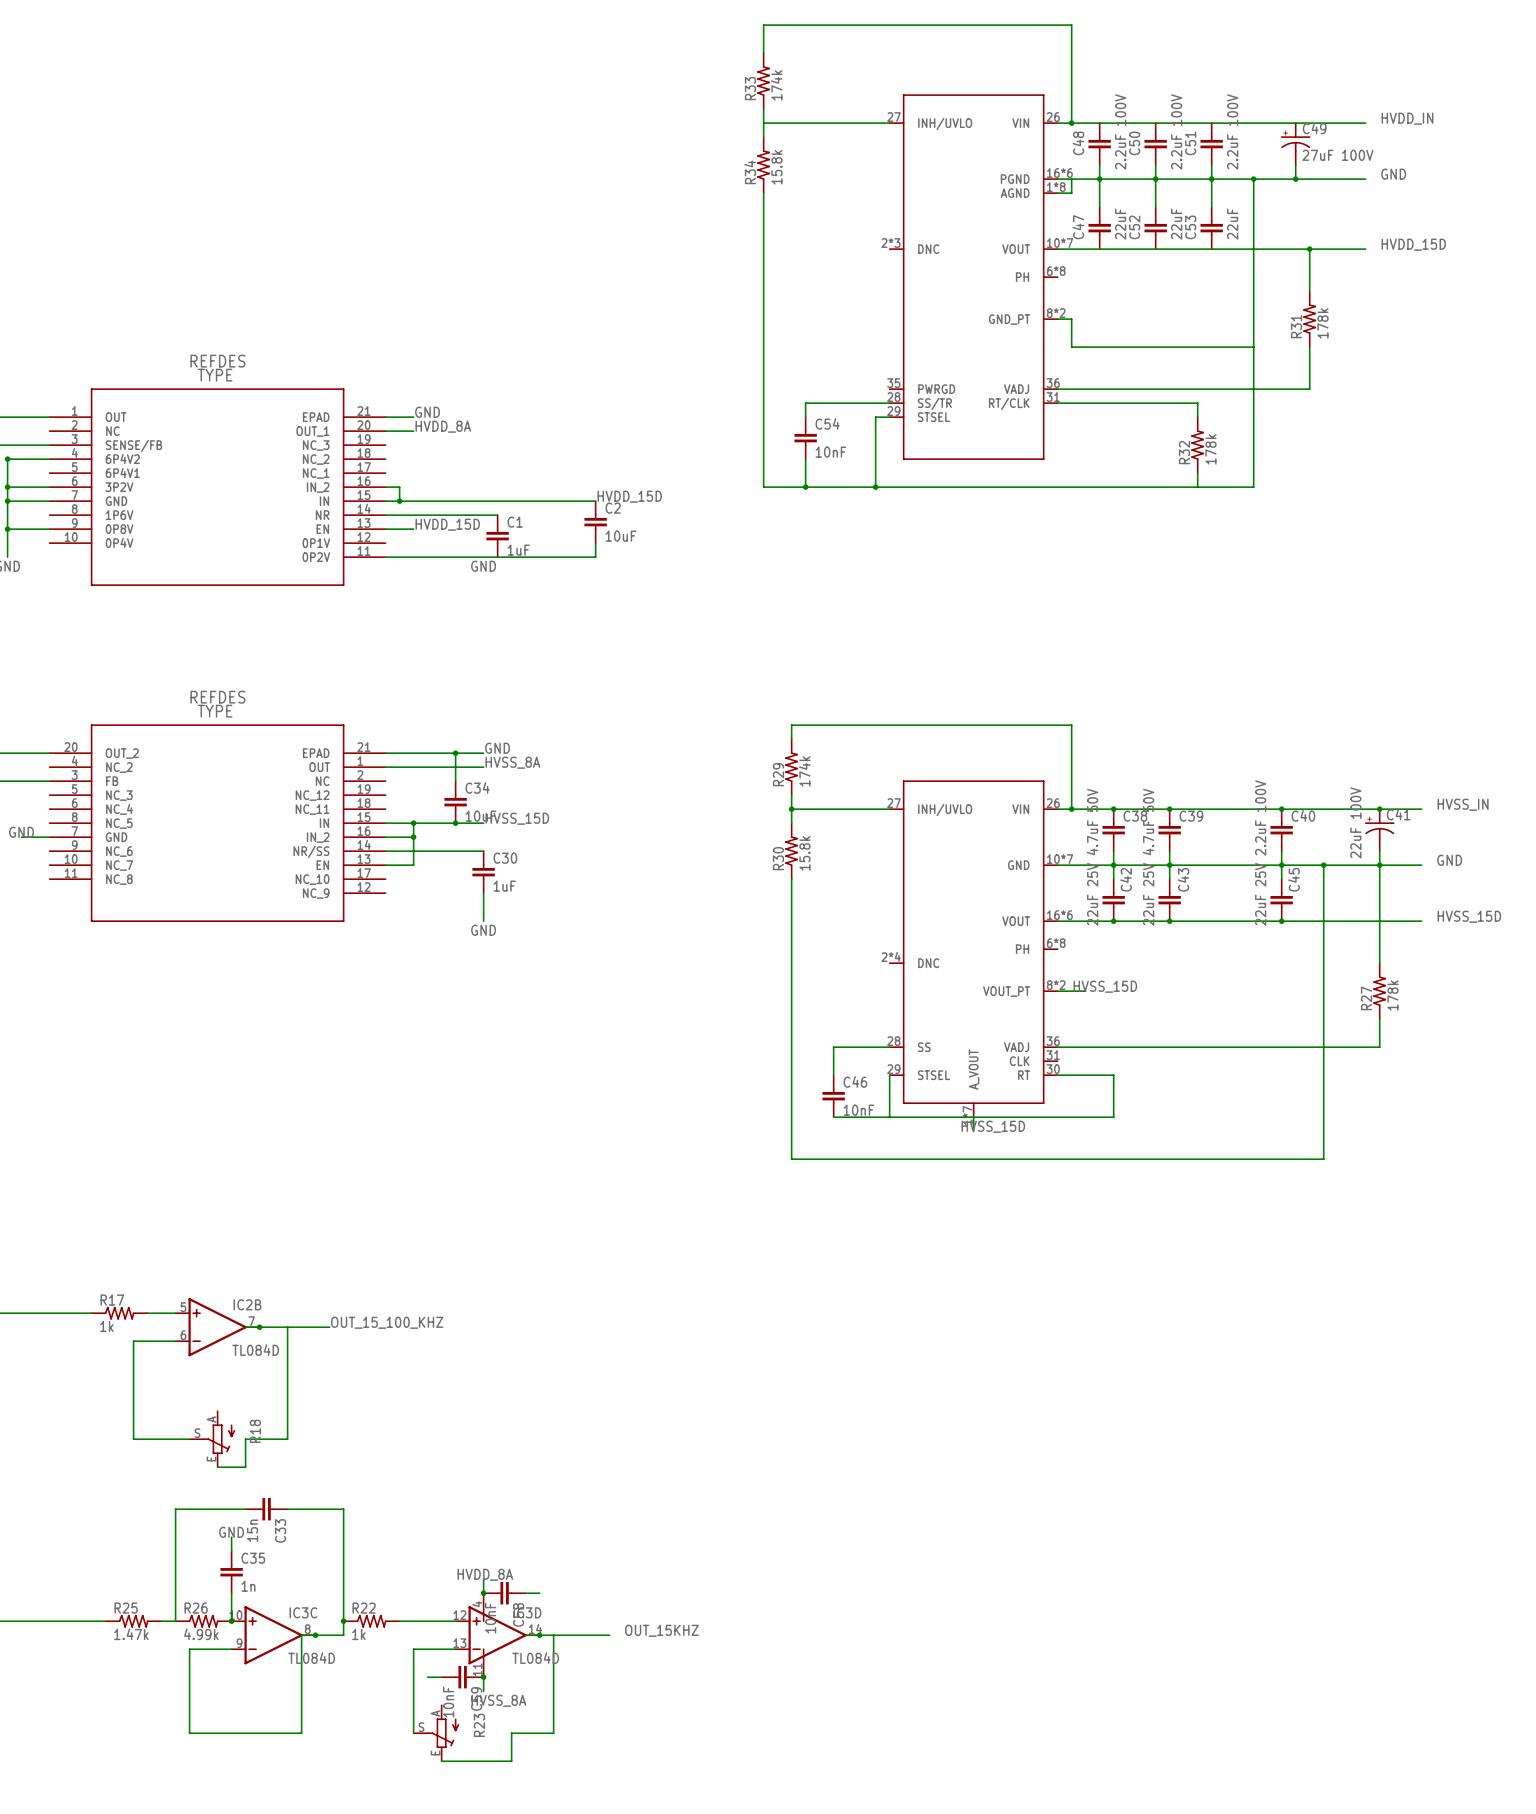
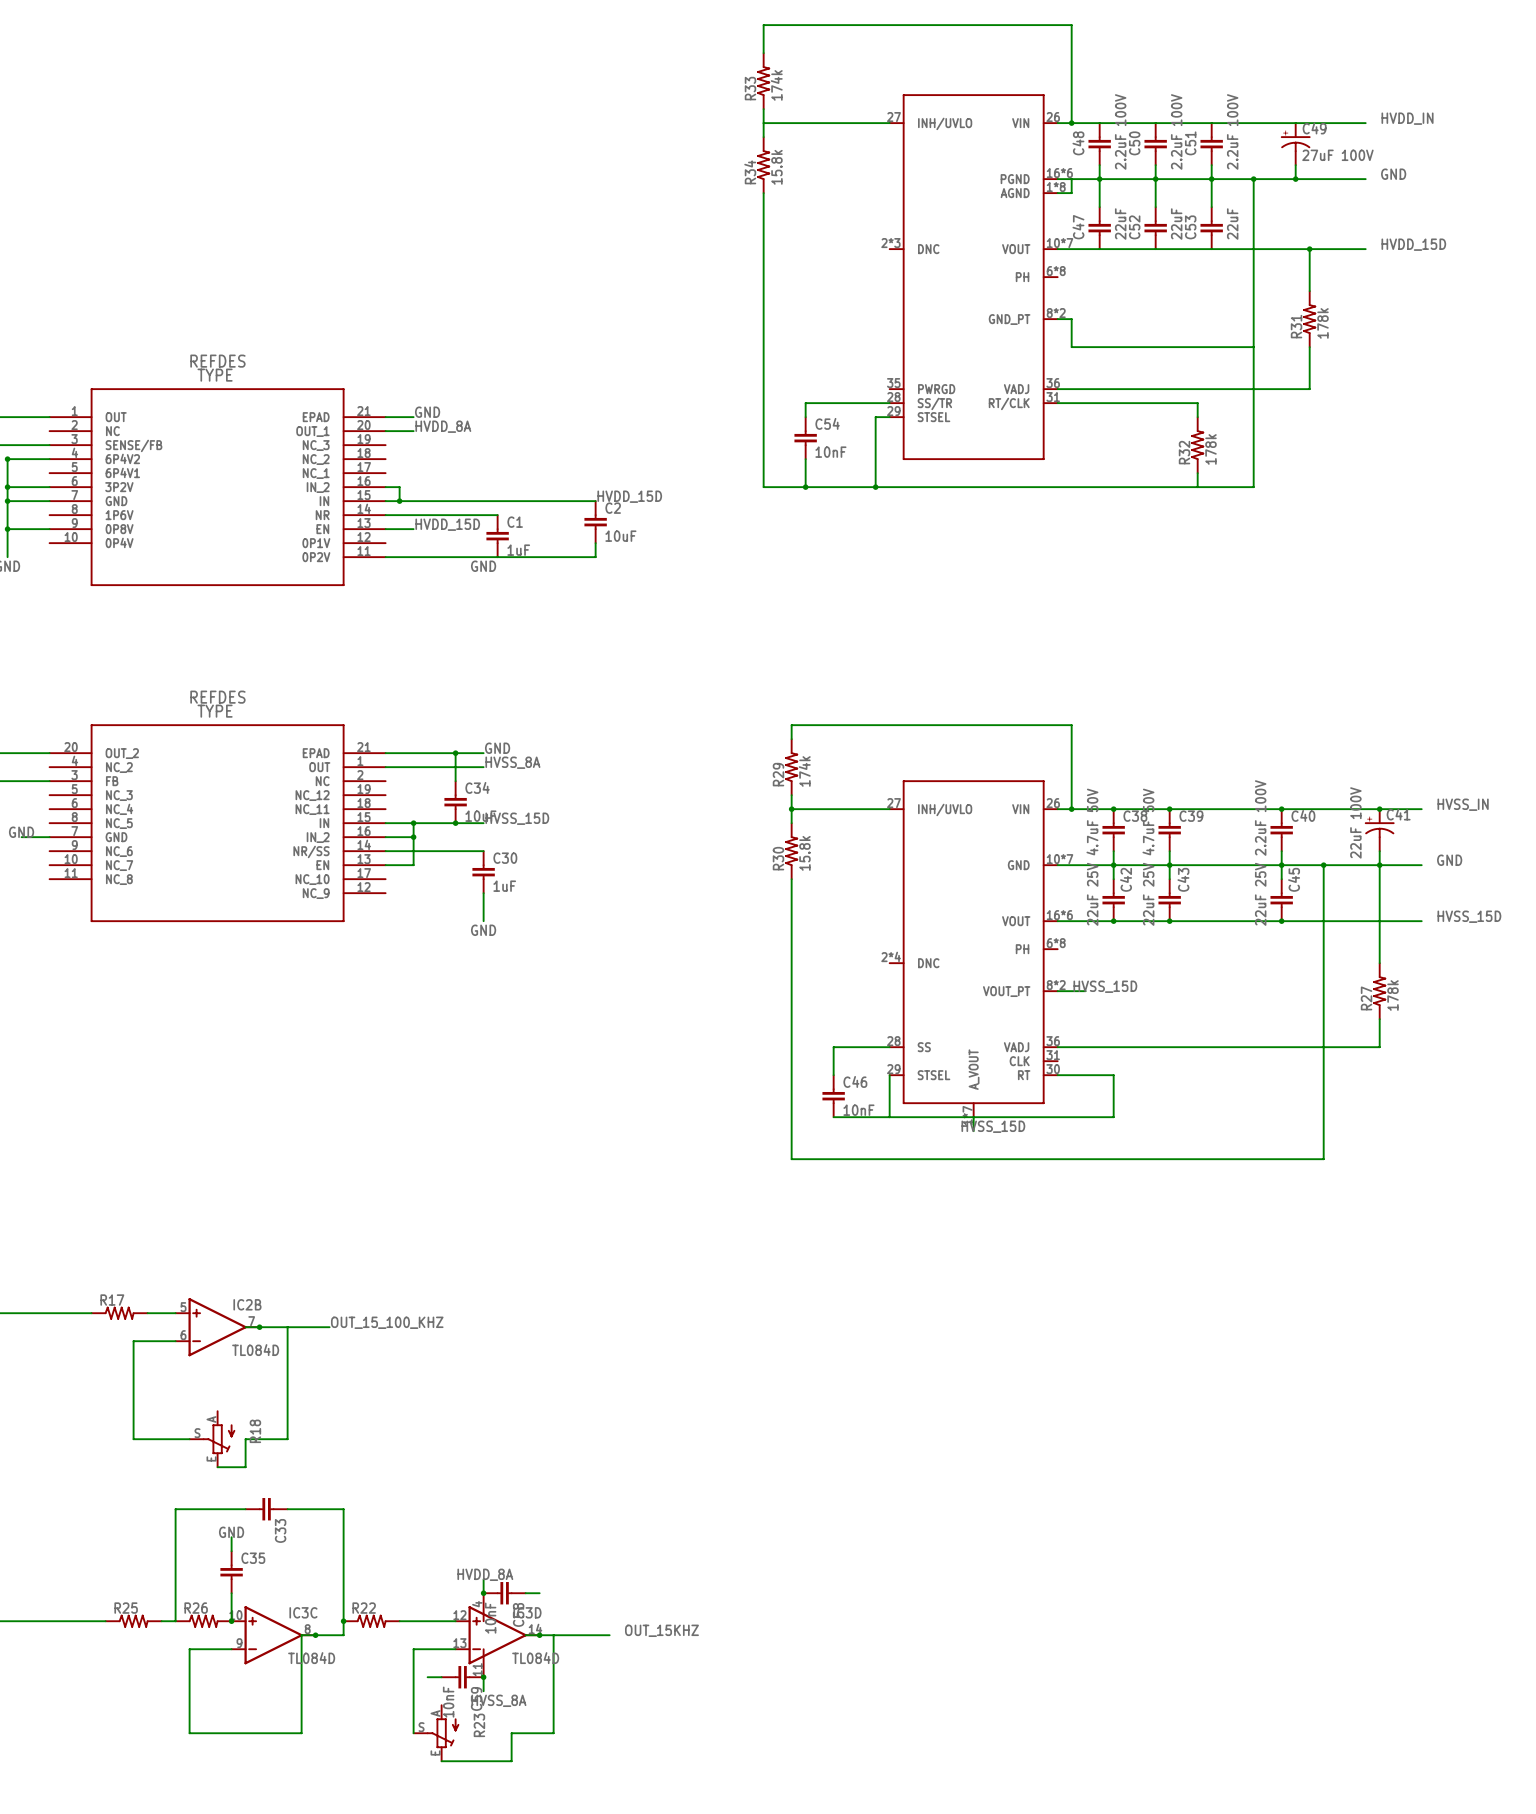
R17 value: 1k (106, 1326) -> none
C33 value: 15n (252, 1530) -> none
C35 value: 1n (248, 1586) -> none
R25 value: 1.47k (131, 1634) -> none
R26 value: 4.99k (201, 1634) -> none
R22 value: 1k (358, 1634) -> none

